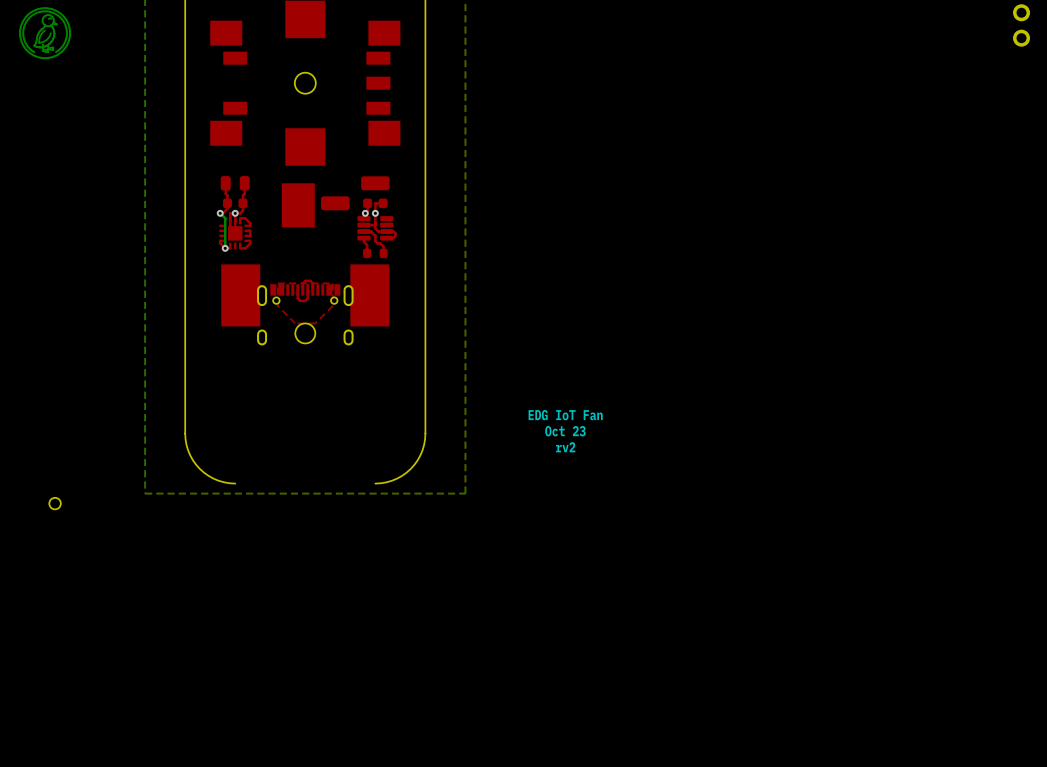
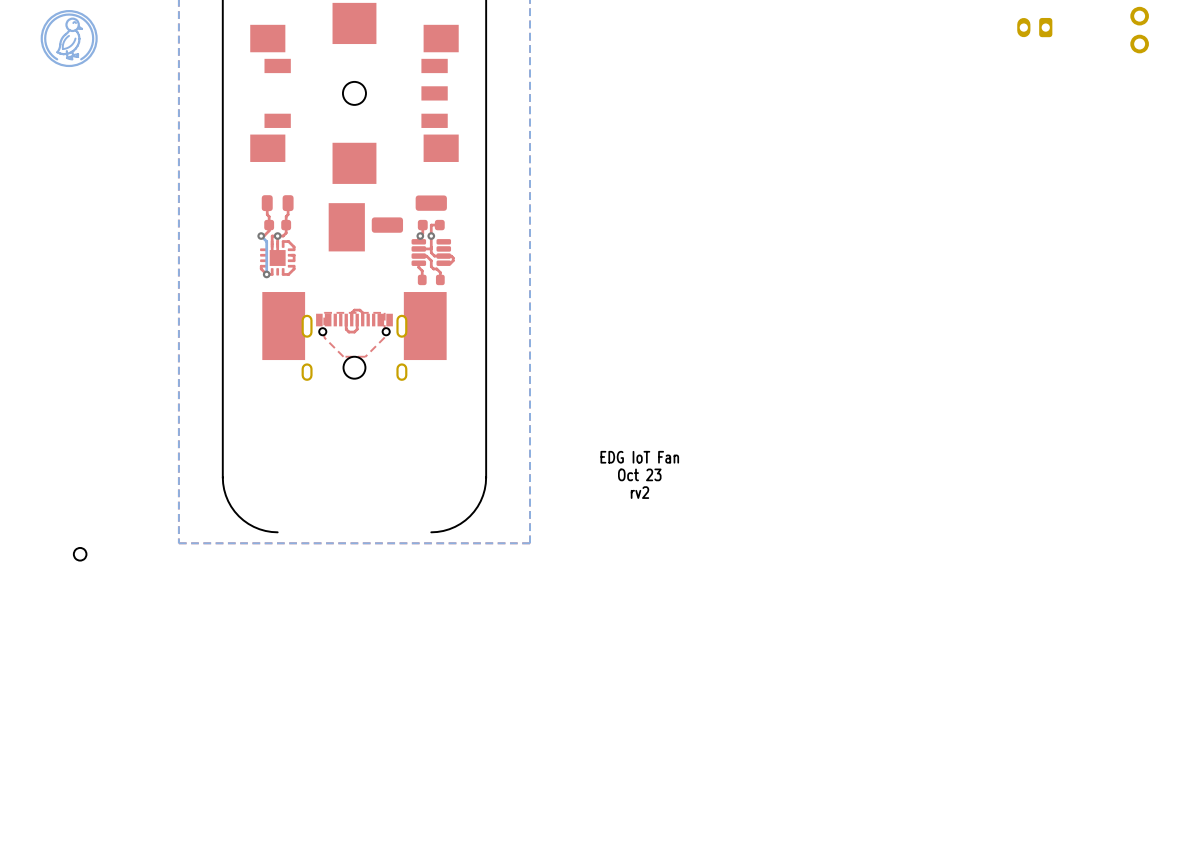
part: none -> (1034, 27)

